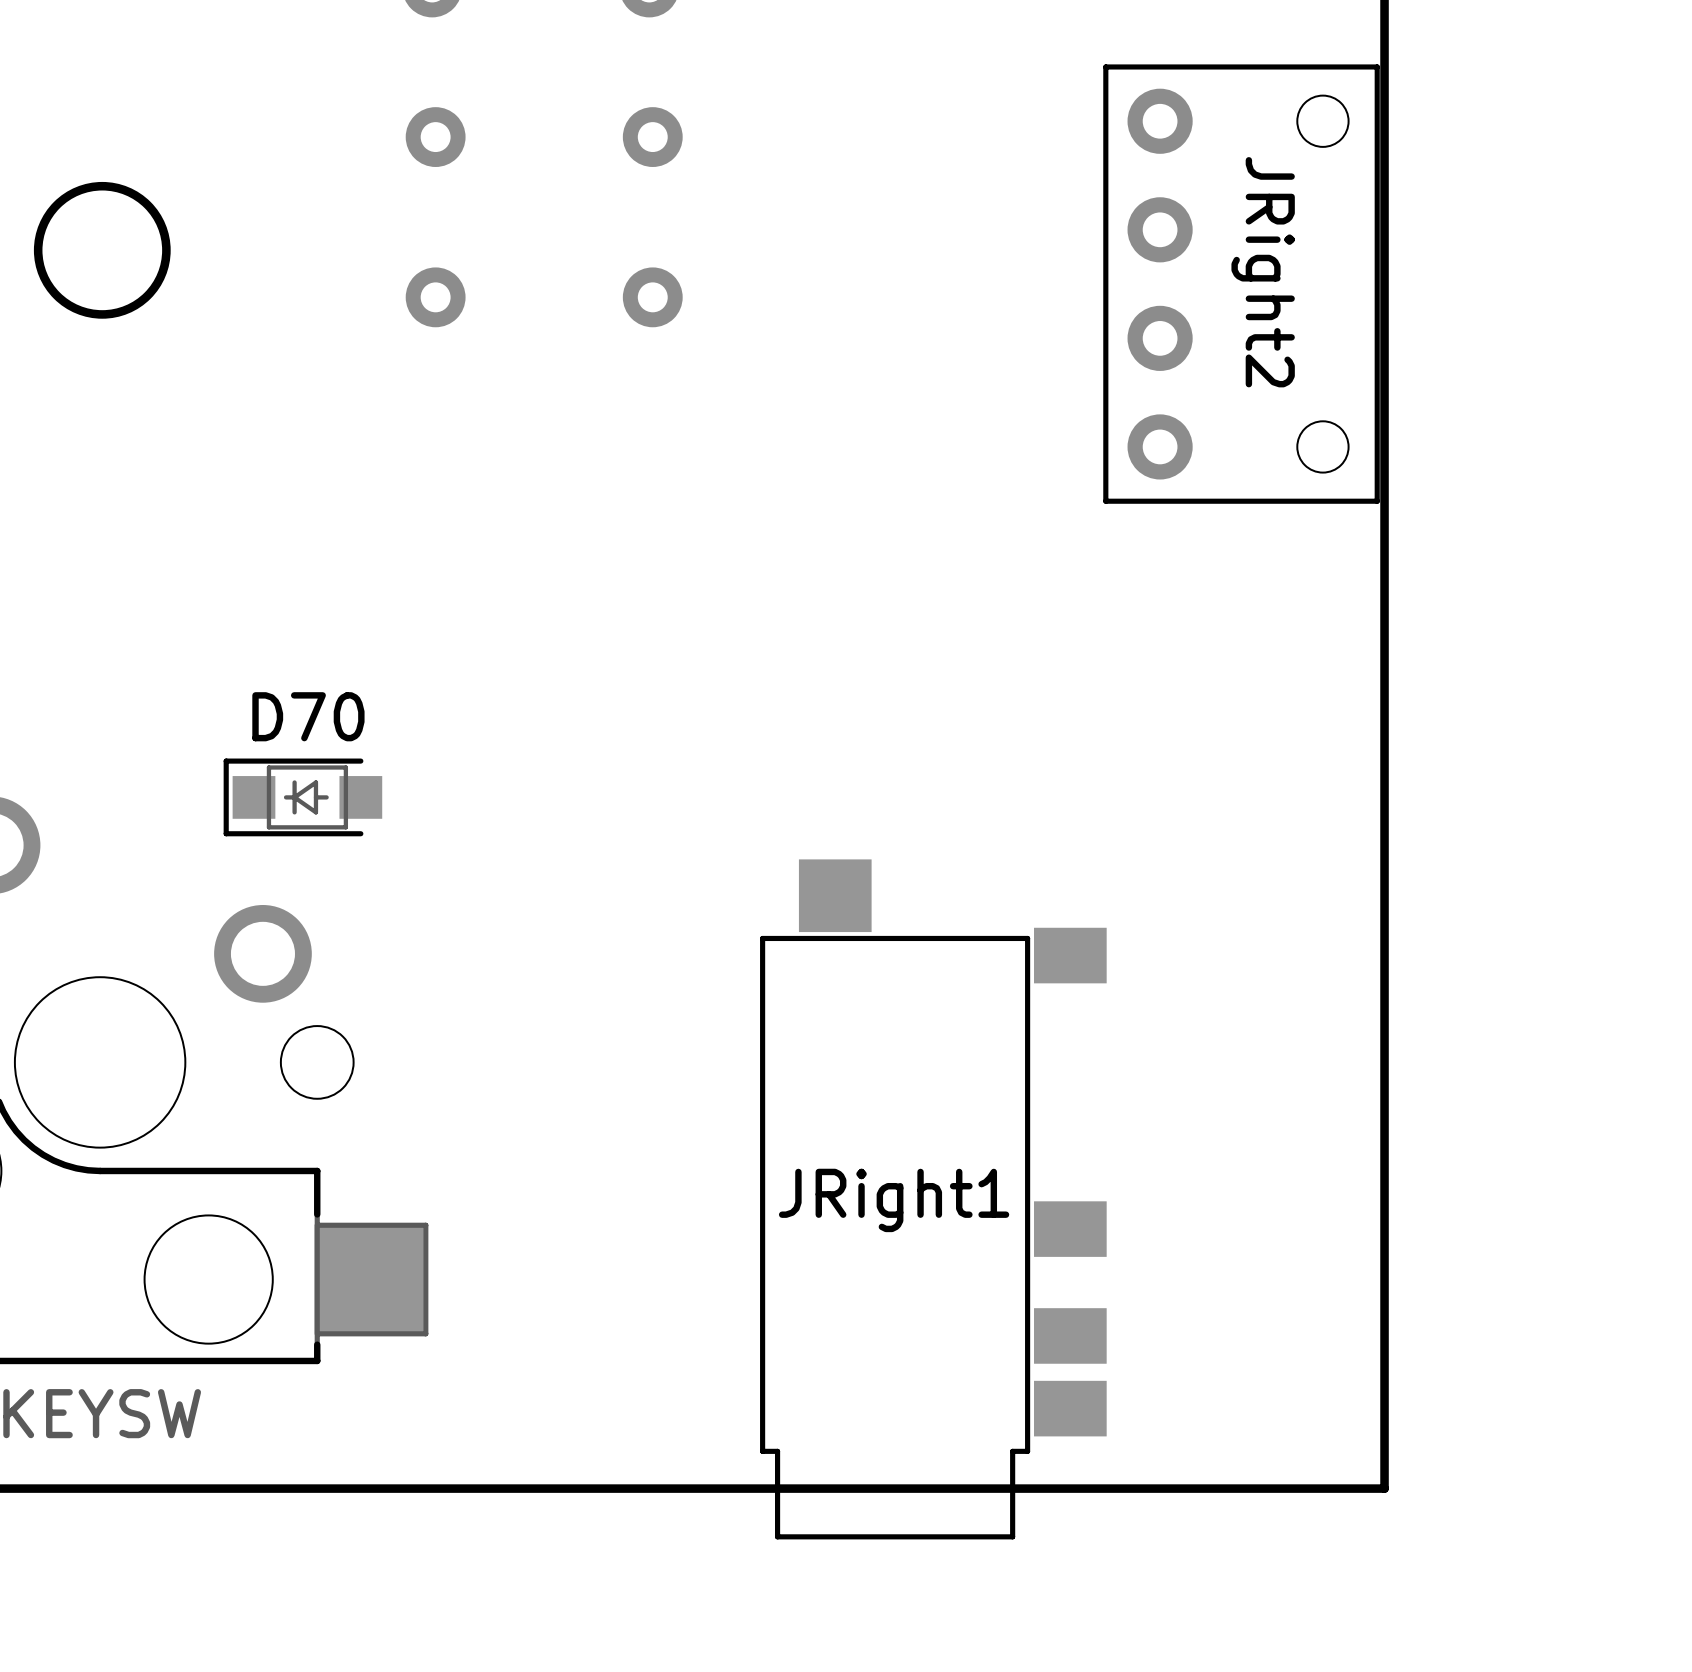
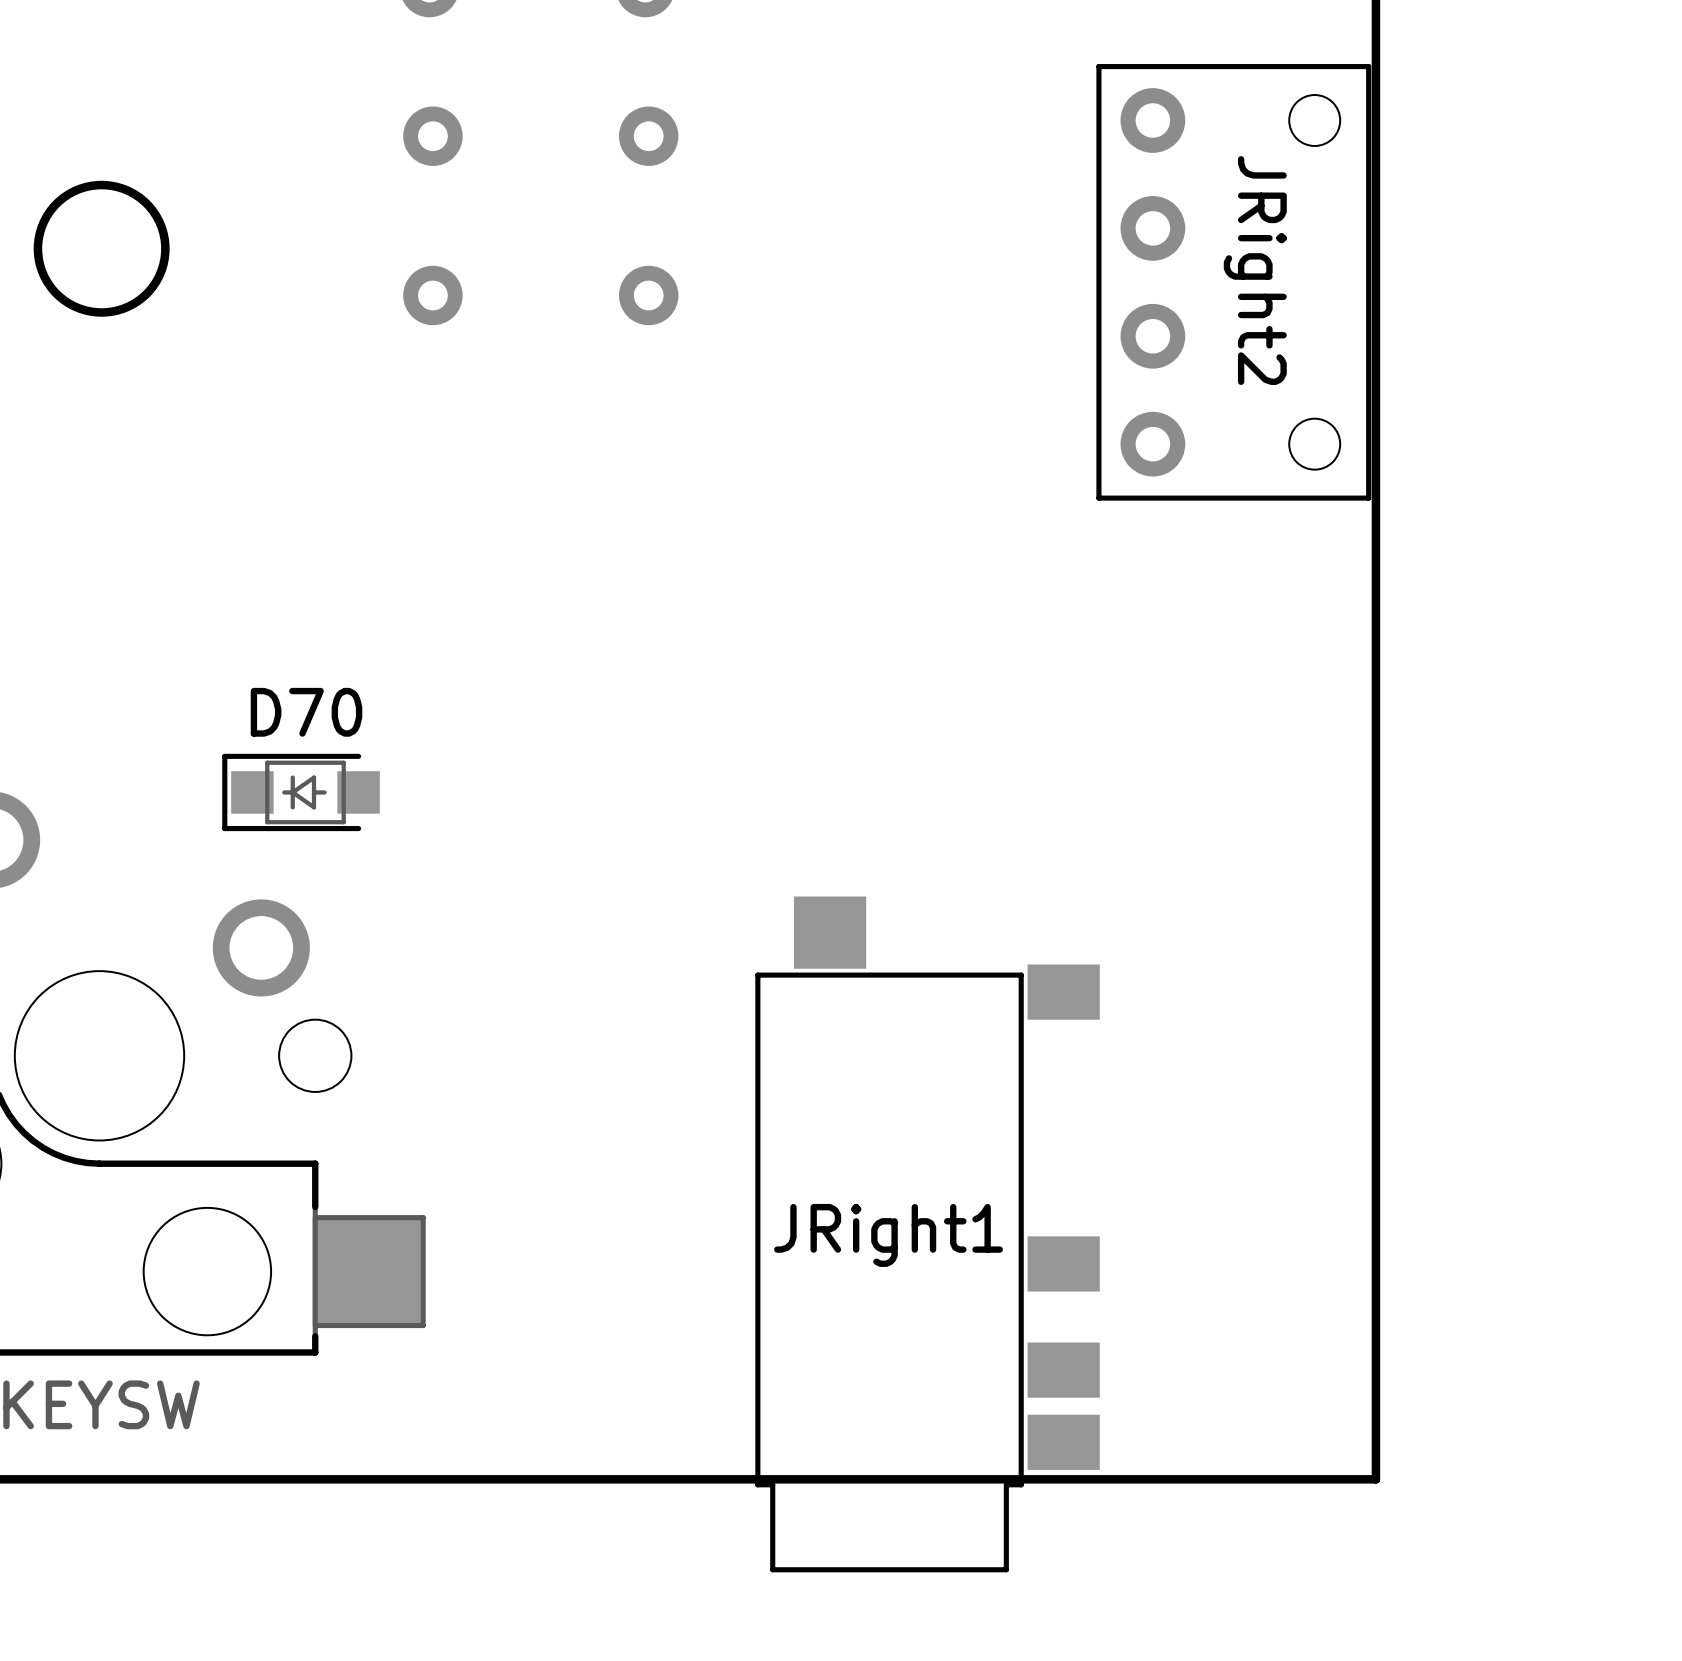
JRight1 position: (933, 1199) -> (927, 1234)

